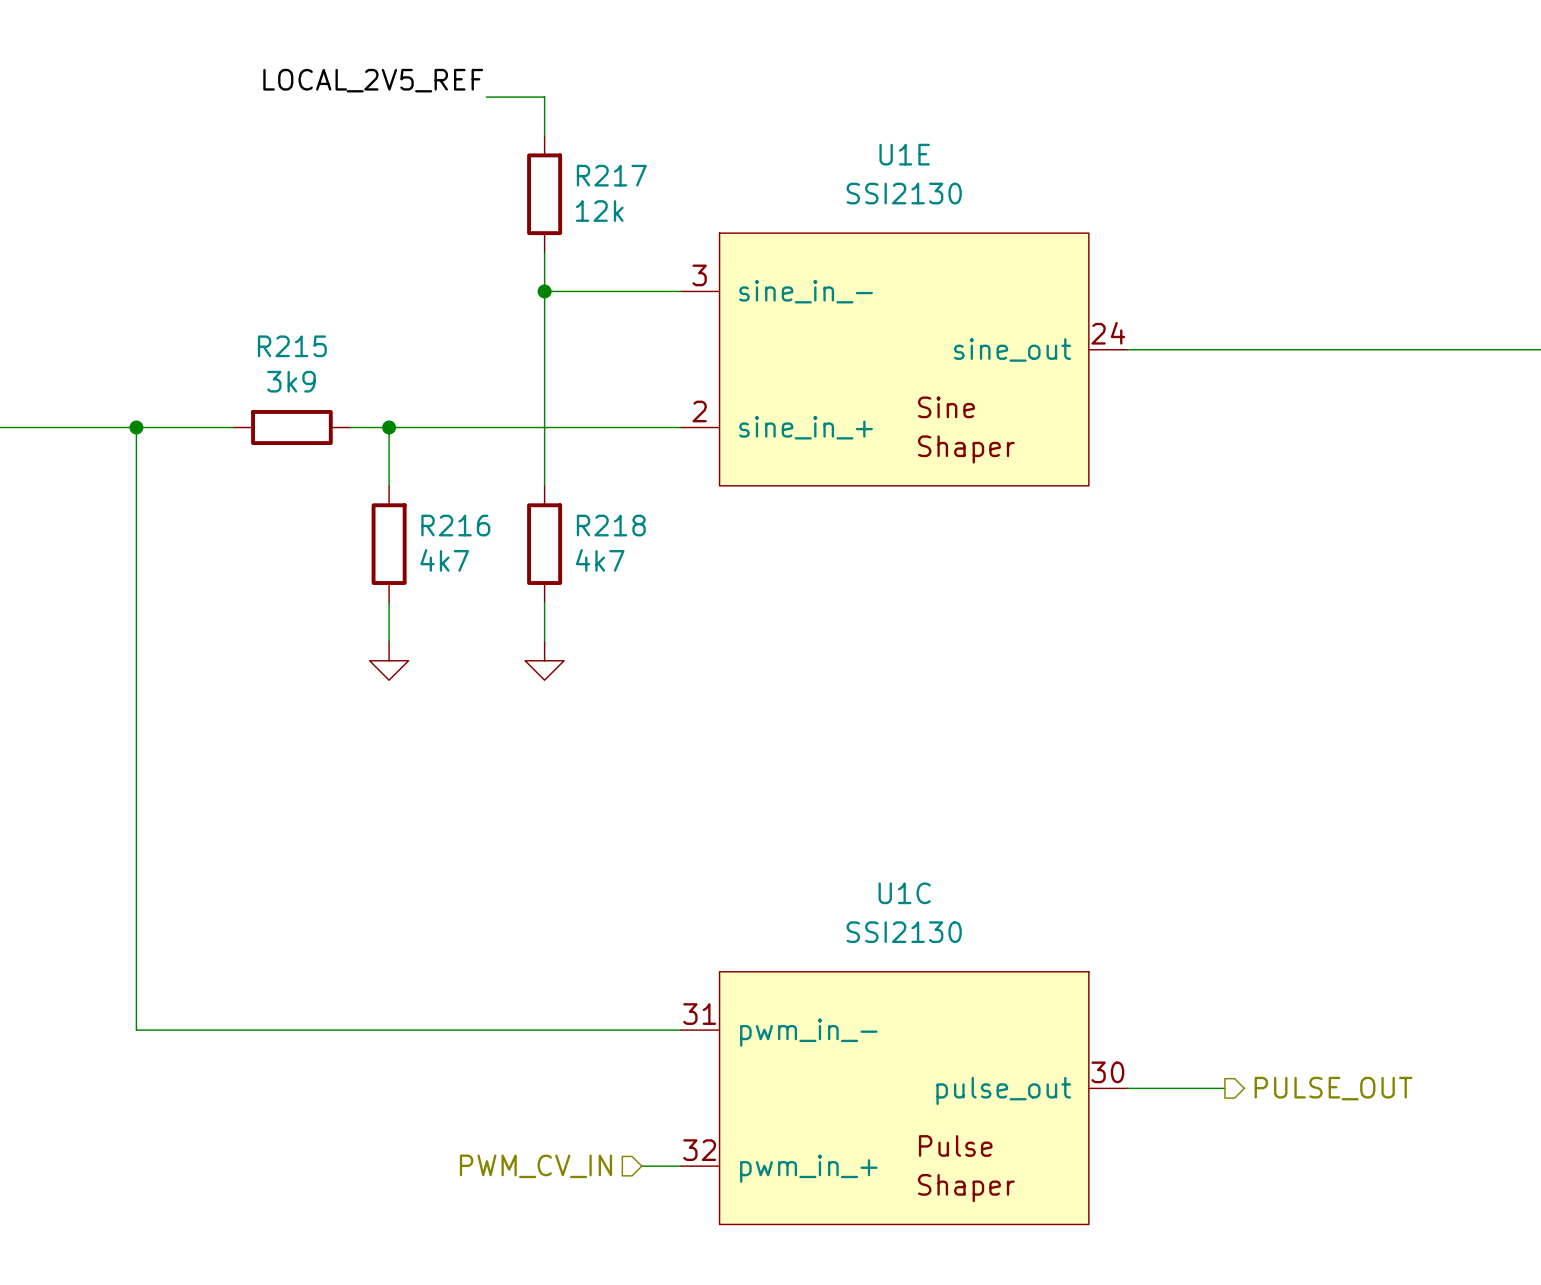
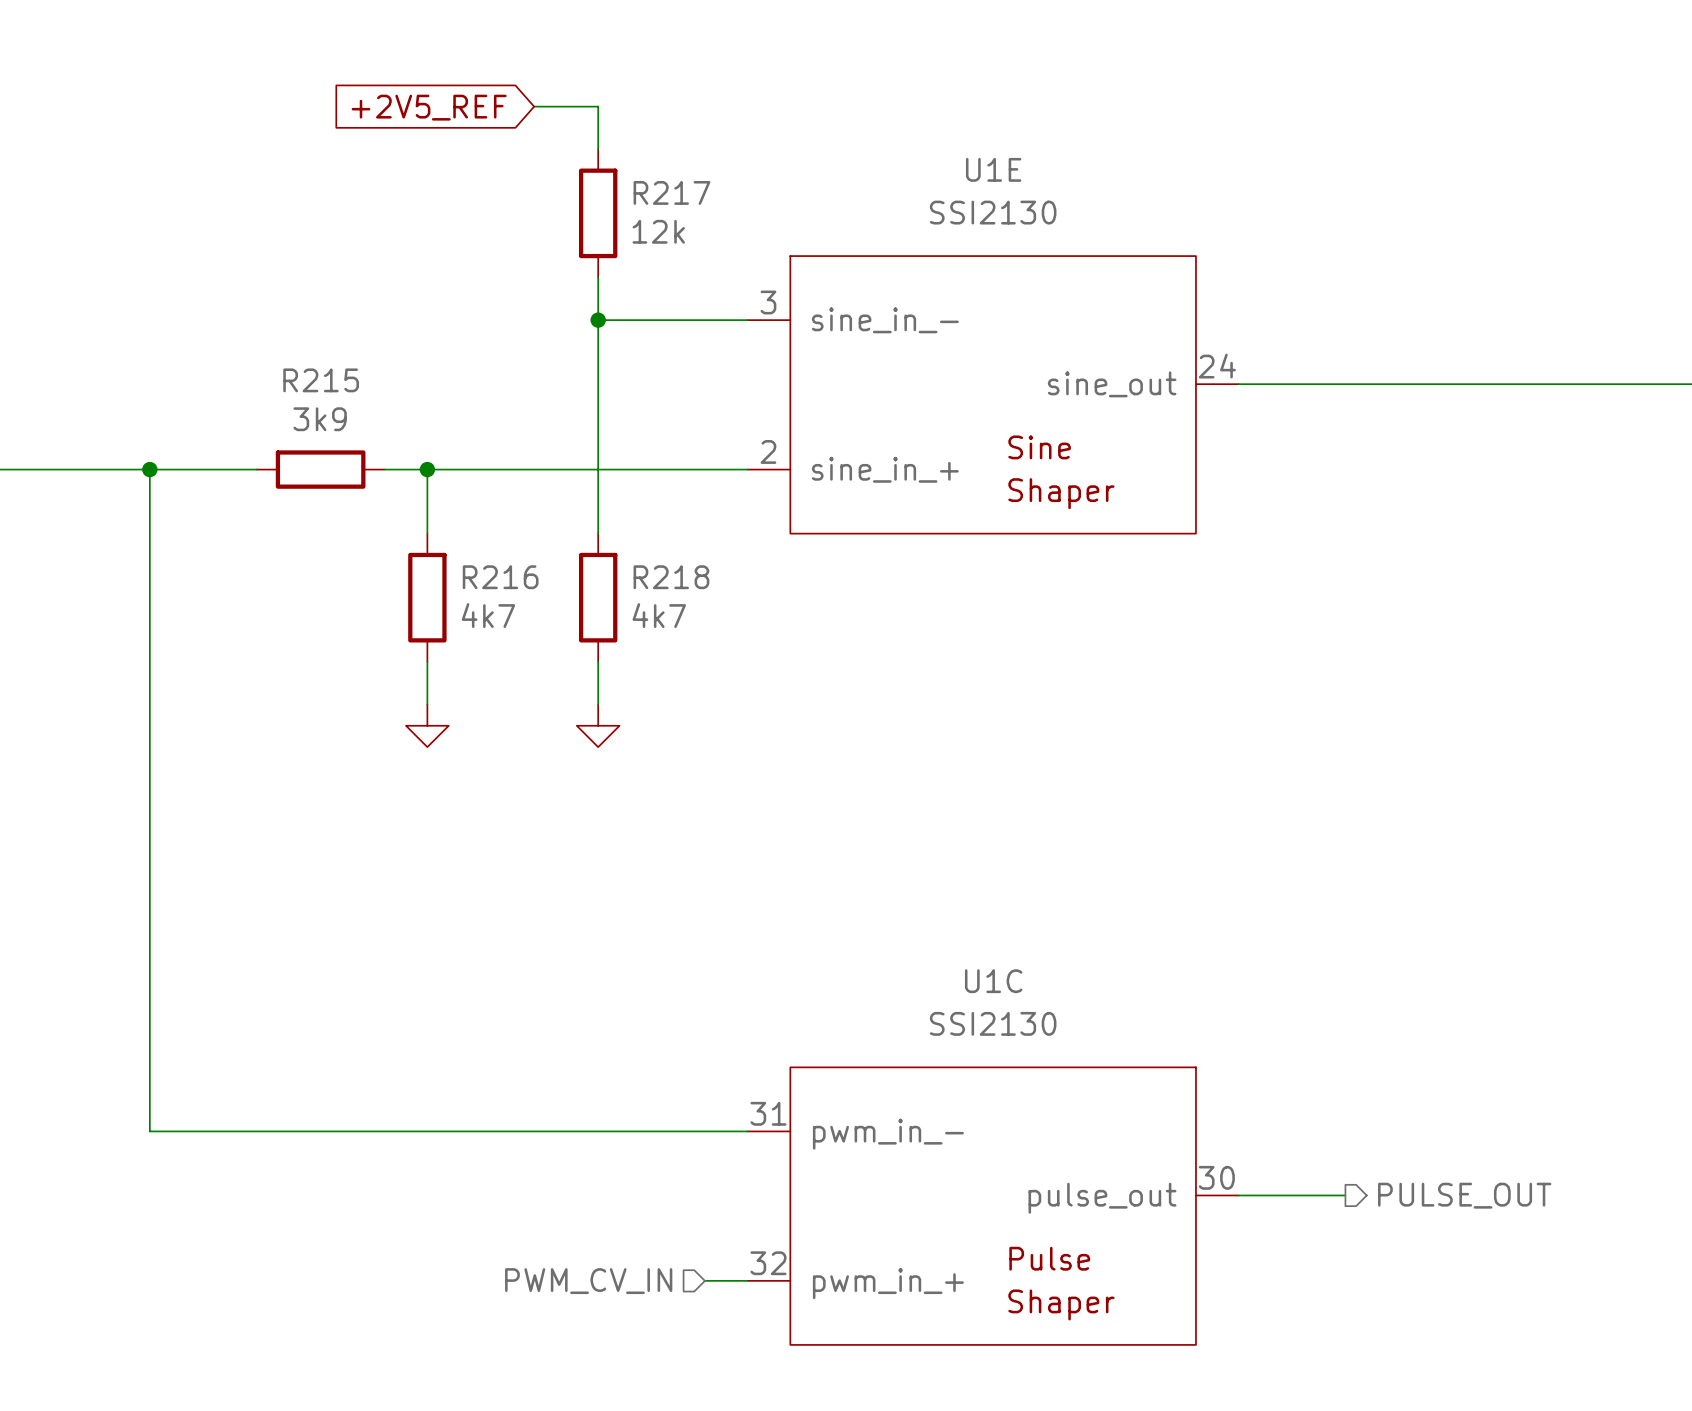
label: LOCAL_2V5_REF (373, 80) -> none
global label: none -> +2V5_REF (429, 107)

